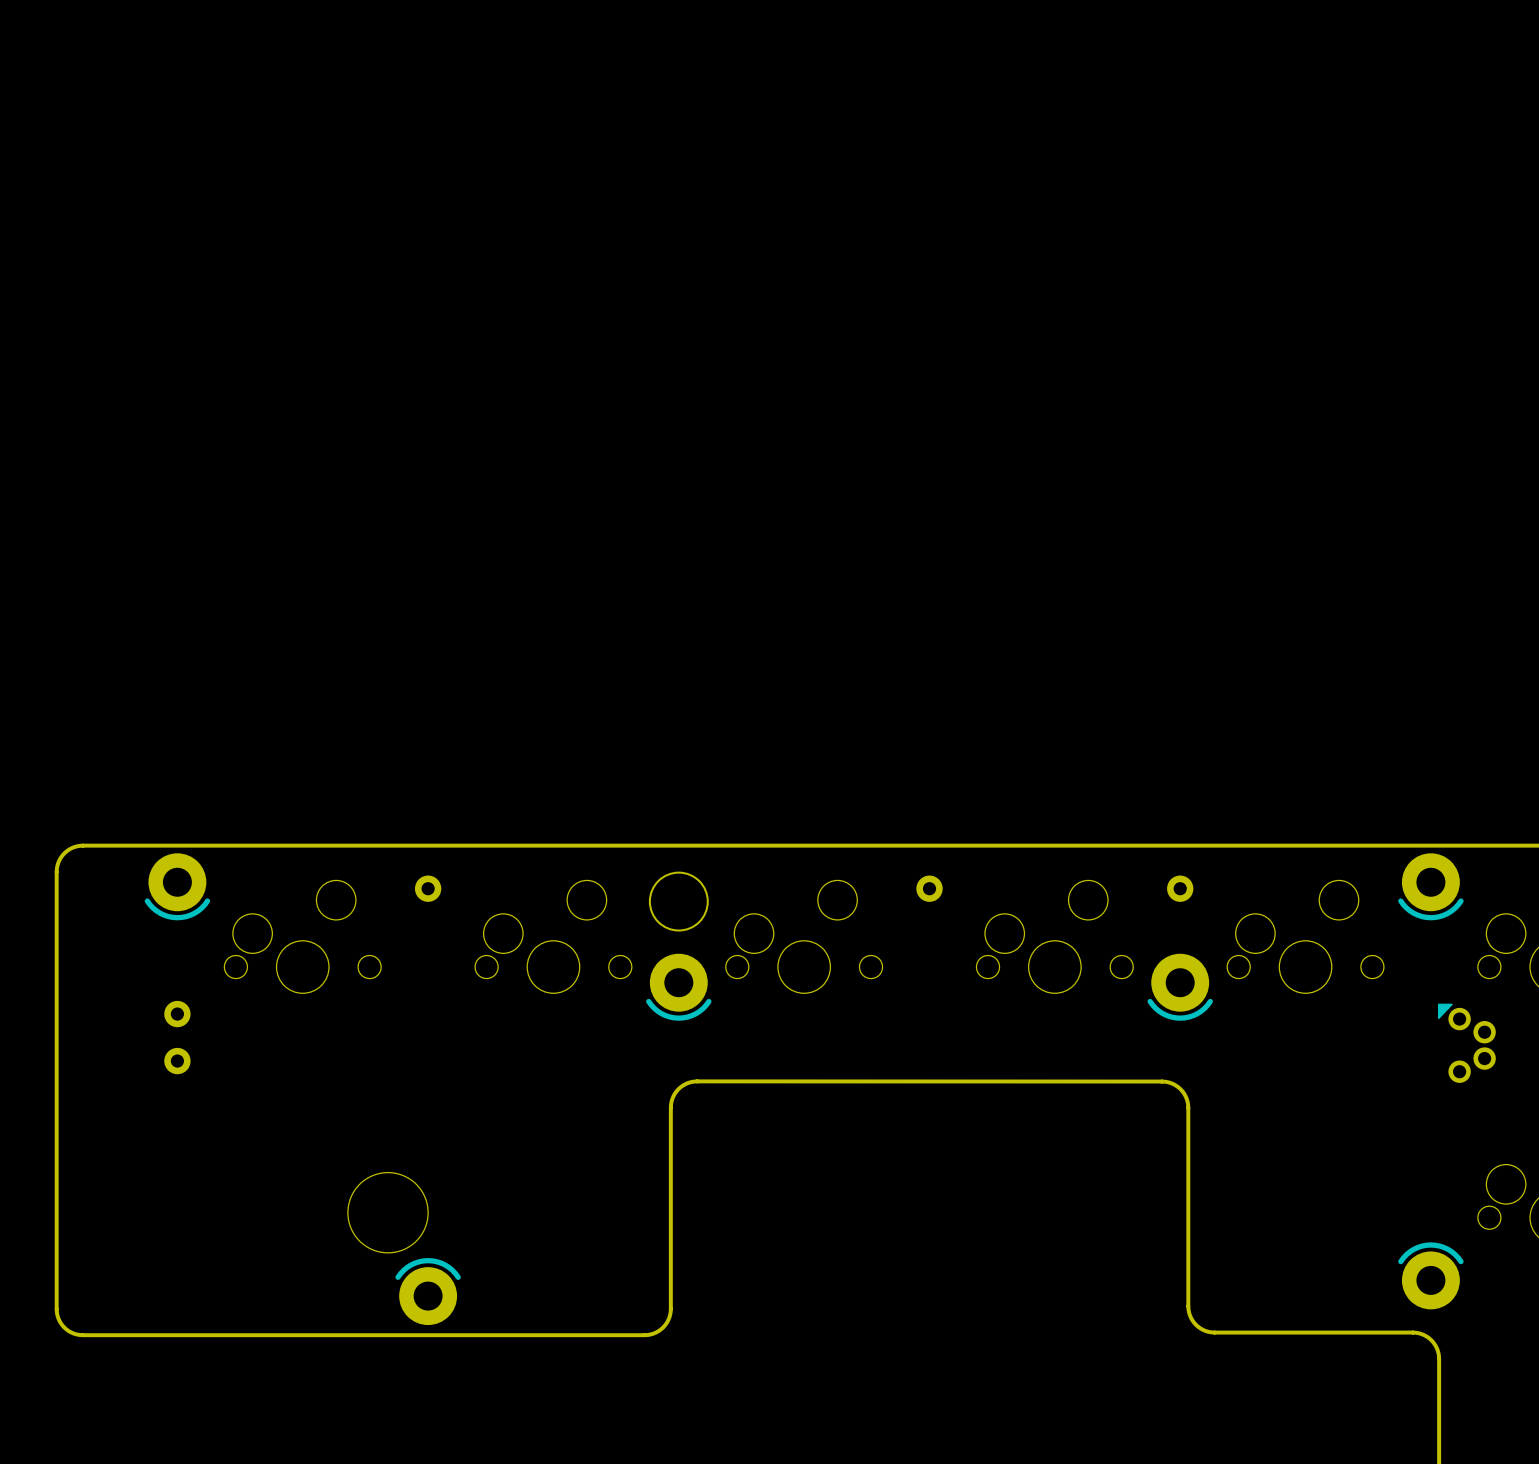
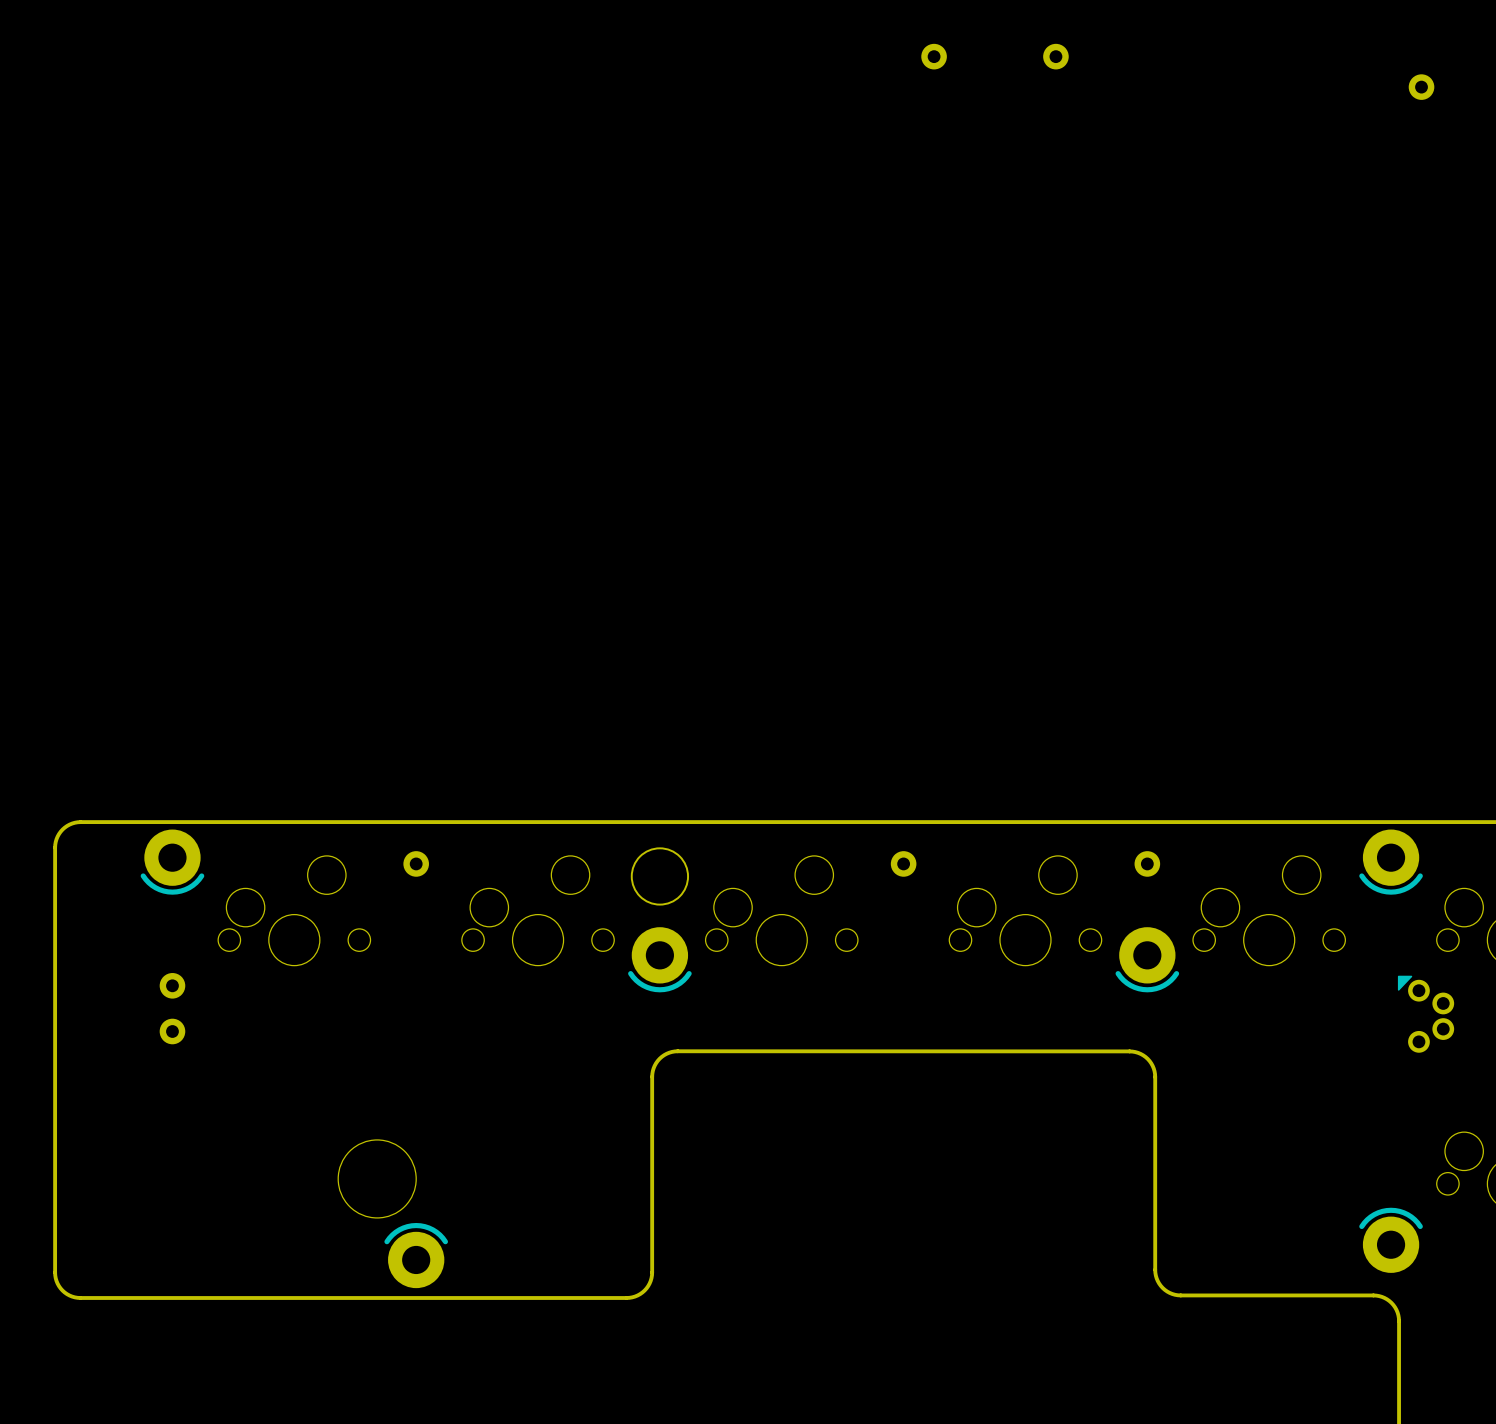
part: none -> (934, 56)
part: none -> (1055, 56)
part: none -> (1421, 87)

